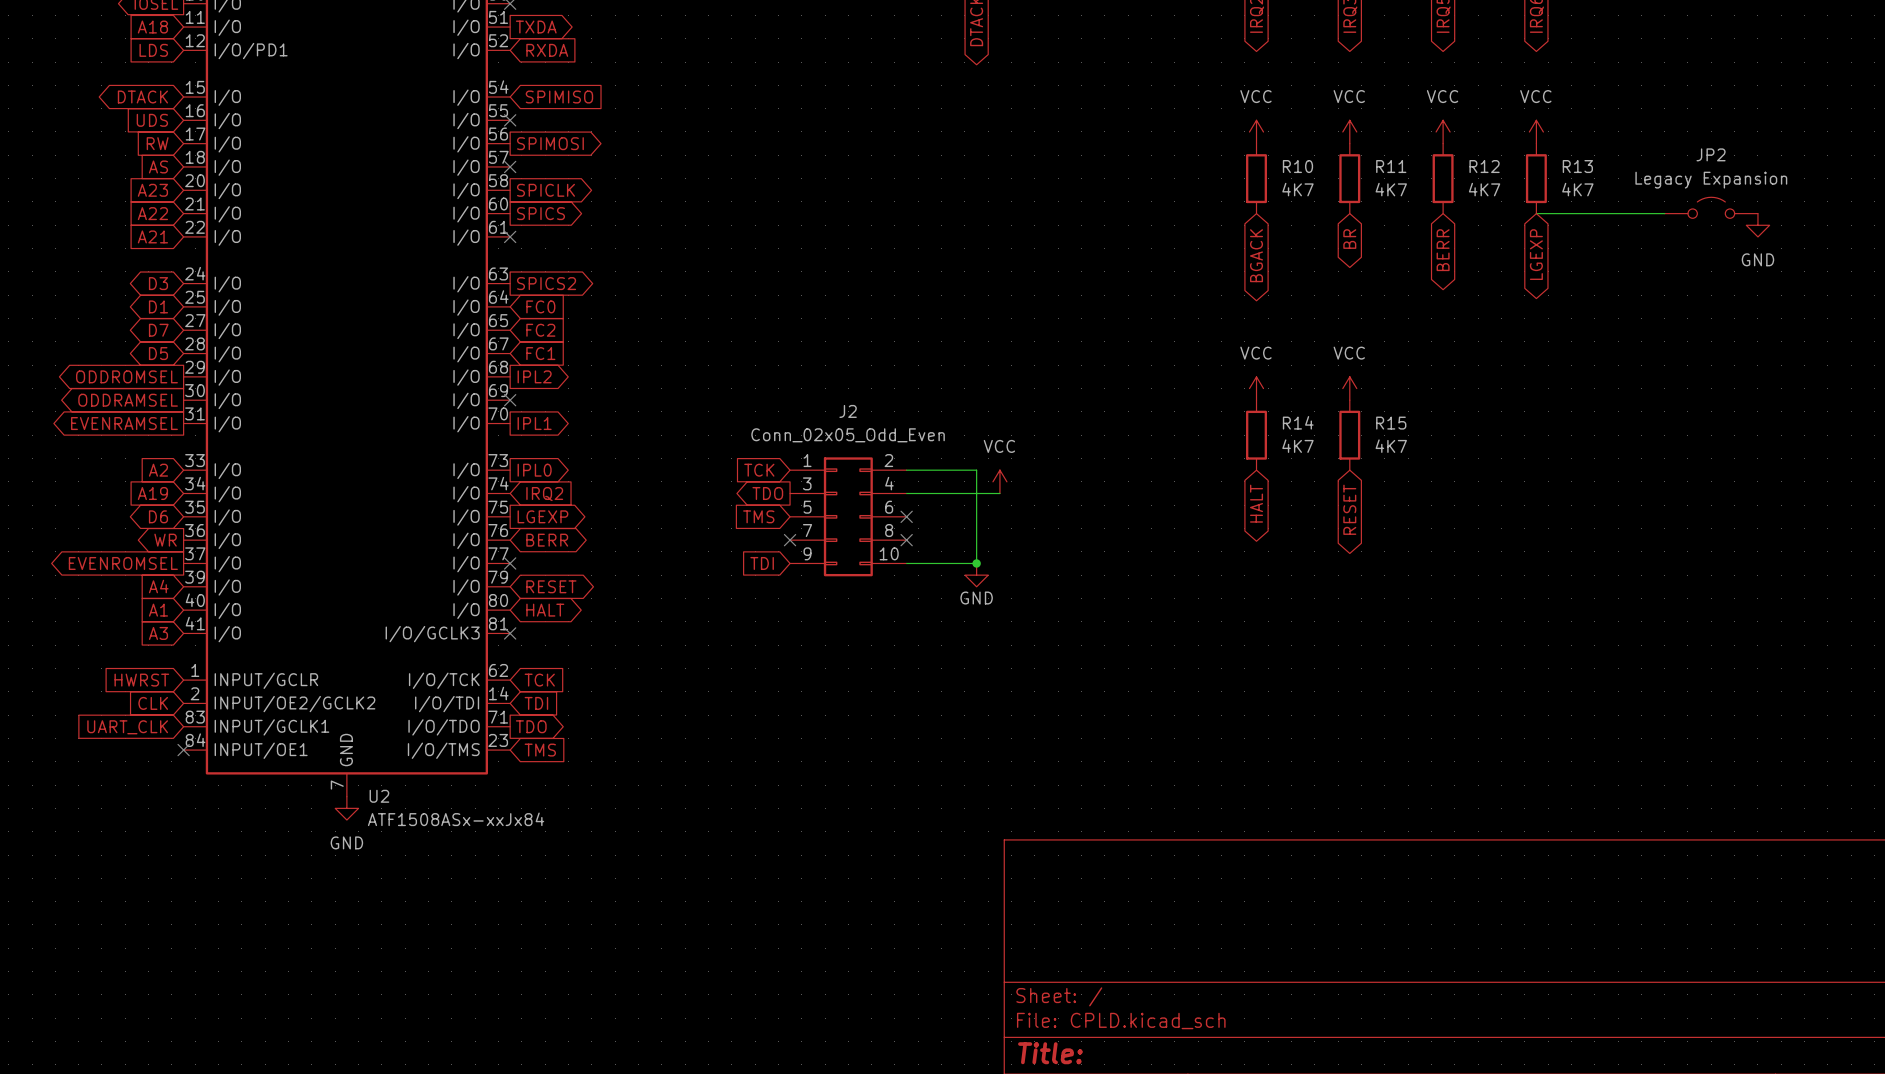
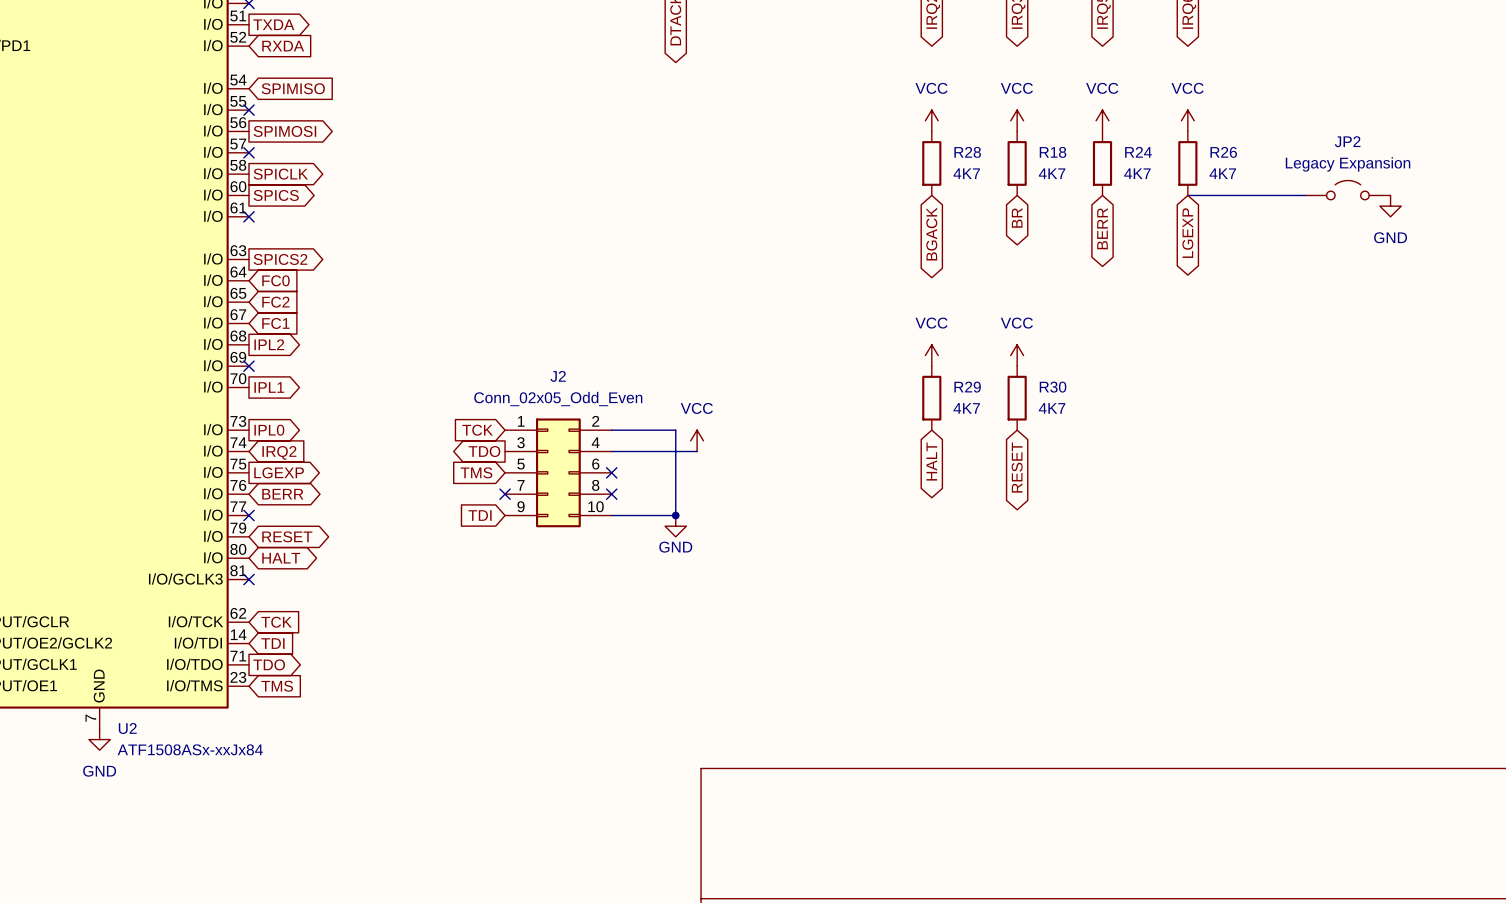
R10 name: R10 (1297, 166) -> R28 (967, 152)
R11 name: R11 (1391, 166) -> R18 (1053, 152)
R12 name: R12 (1484, 166) -> R24 (1138, 152)
R13 name: R13 (1577, 166) -> R26 (1223, 152)
R14 name: R14 (1298, 422) -> R29 (967, 387)
R15 name: R15 (1391, 423) -> R30 (1053, 387)

